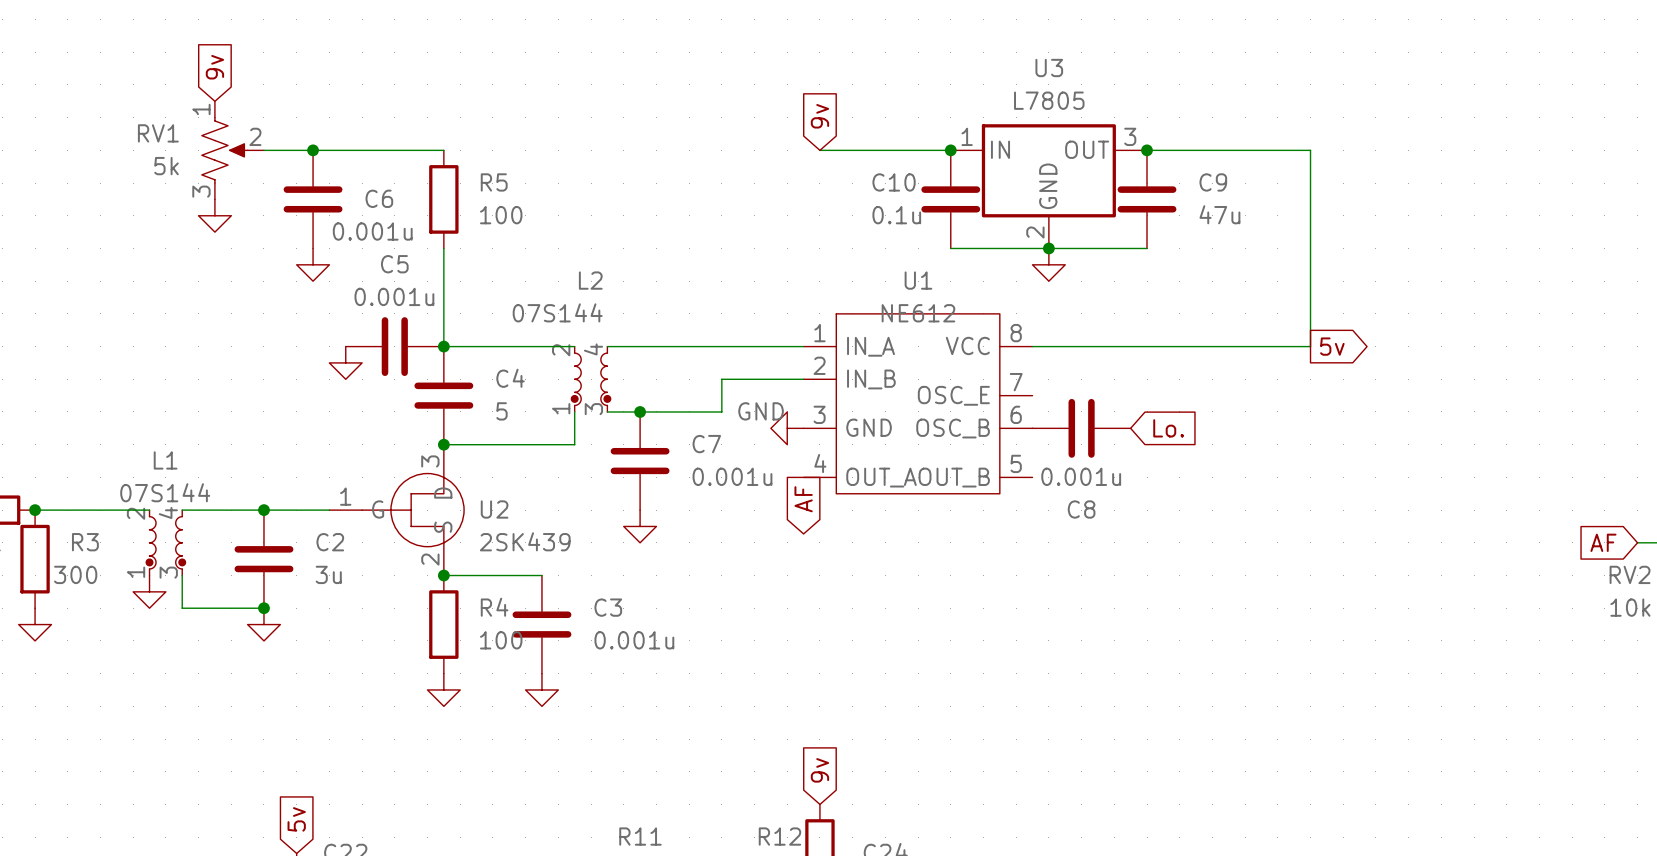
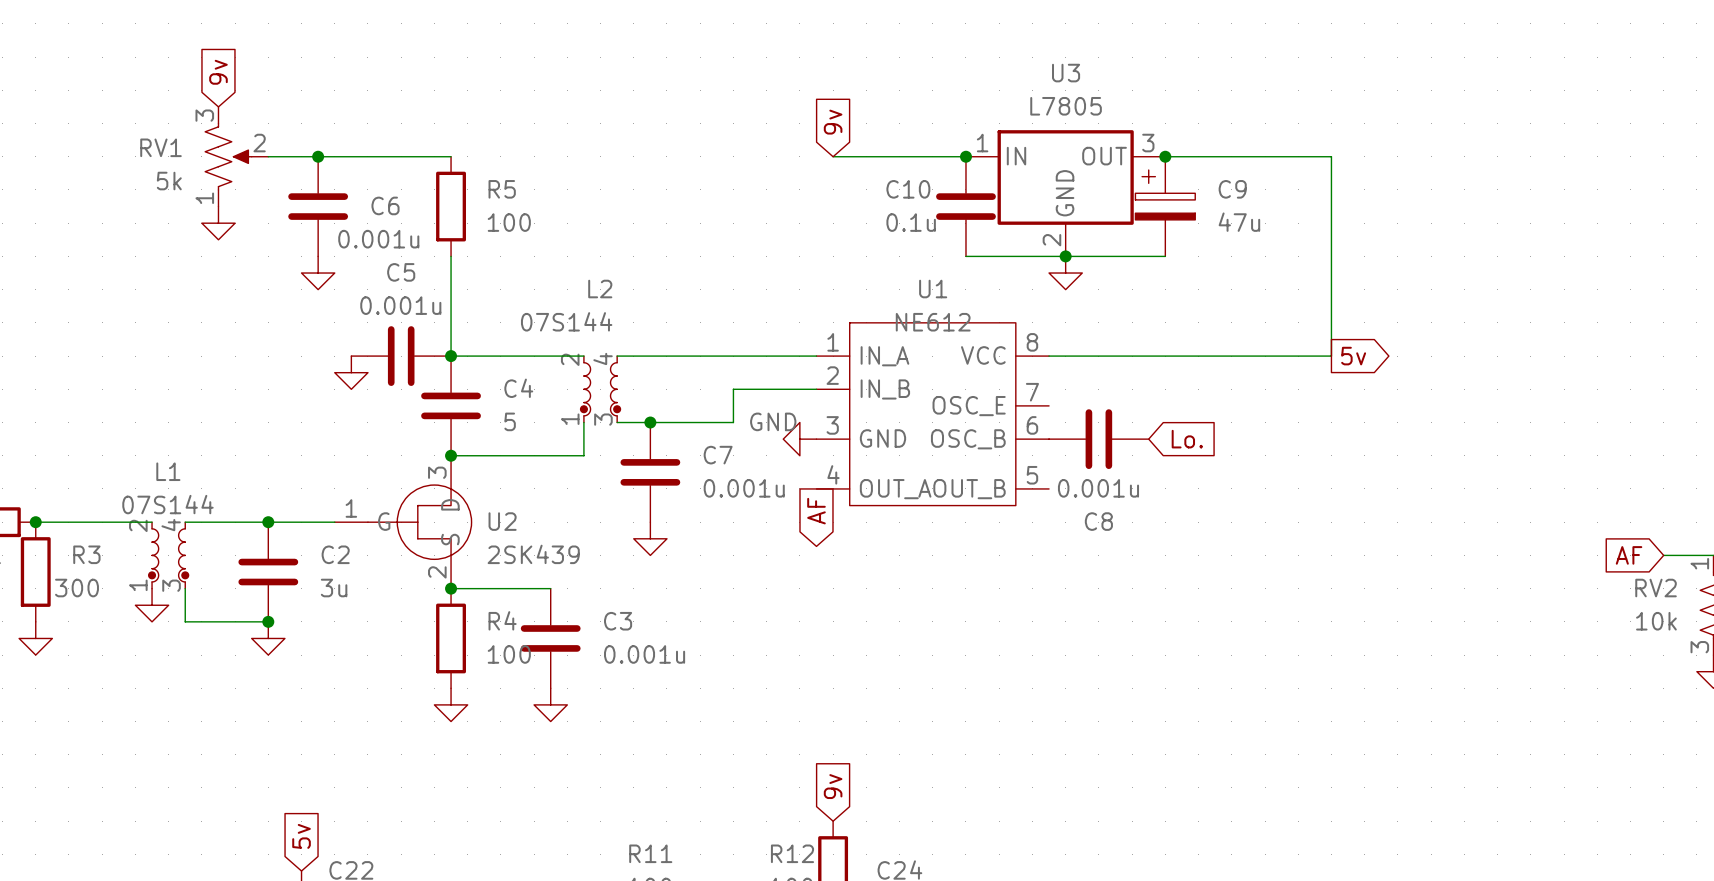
RV1 flip: as is (224, 150) -> up-down (228, 156)
C9 symbol: [1117, 150, 1177, 249] -> [1135, 156, 1196, 257]

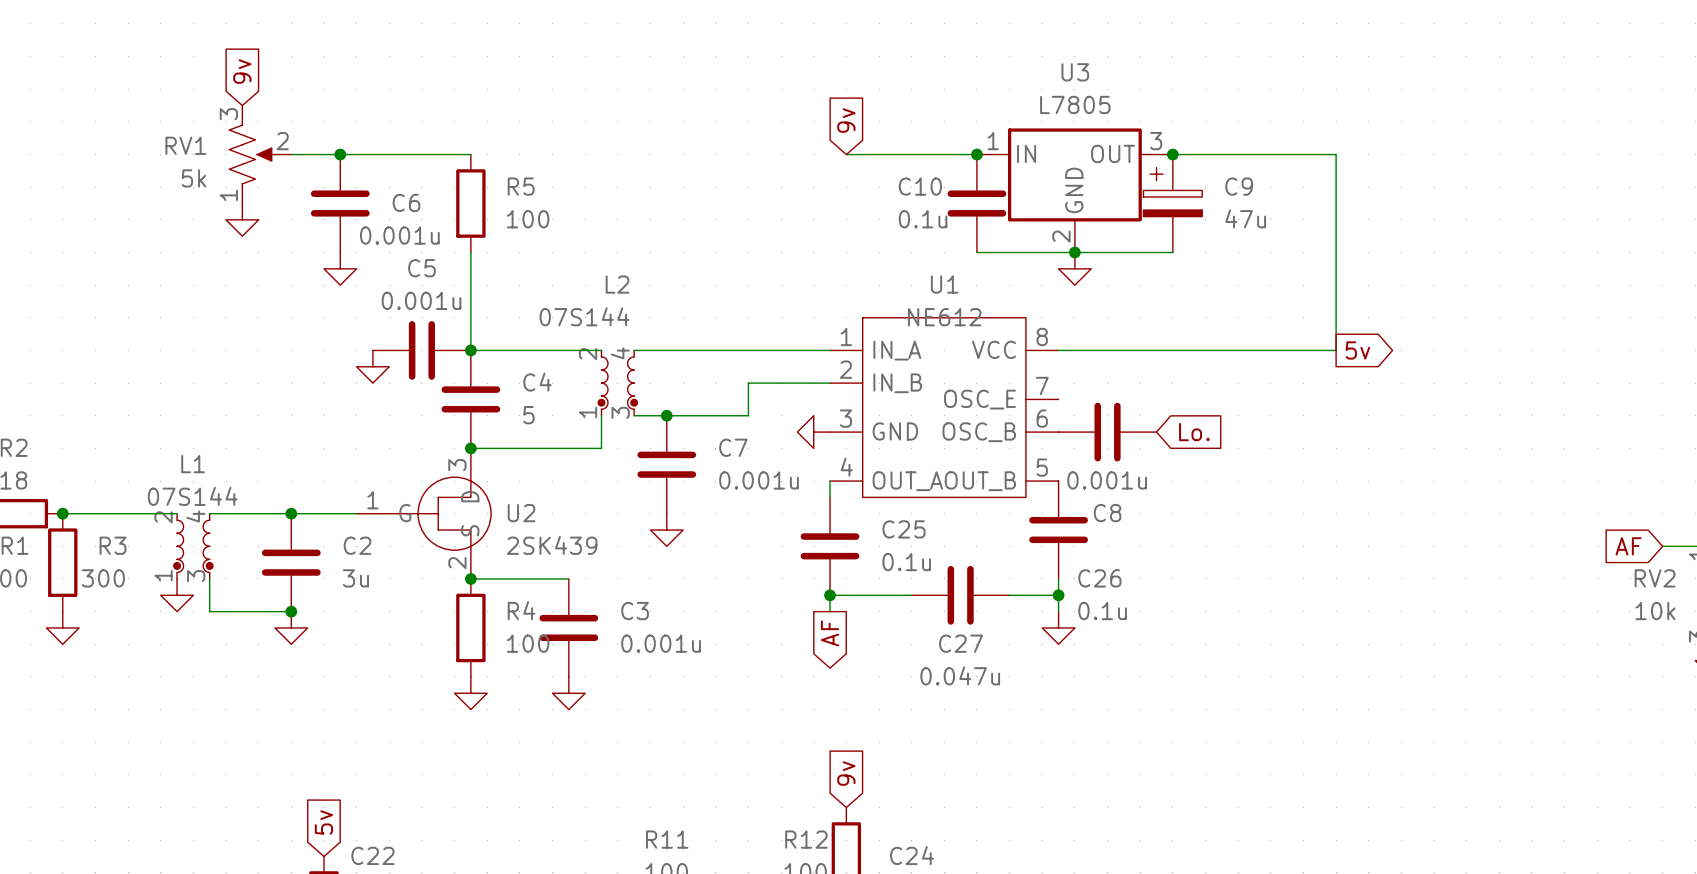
power symbol text: GND (773, 421) -> none
wire: none -> (830, 481) (830, 497)
global label position: AF (816, 511) -> AF (830, 633)
C26: none -> 0.1u (1058, 530)
C25: none -> 0.1u (830, 546)
wire: none -> (1058, 578) (1058, 611)
junction: none -> (830, 595)
wire: none -> (911, 595) (830, 595) (830, 611)
C27: none -> 0.047u (960, 595)
wire: none -> (1009, 595) (1058, 595)
junction: none -> (1058, 595)
power symbol: none -> (1058, 627)

